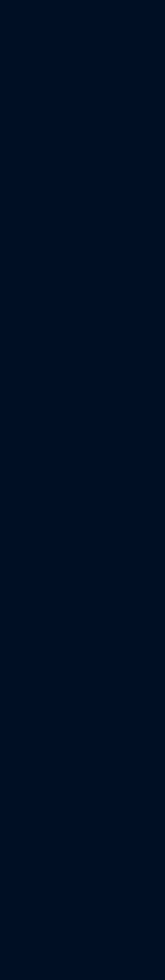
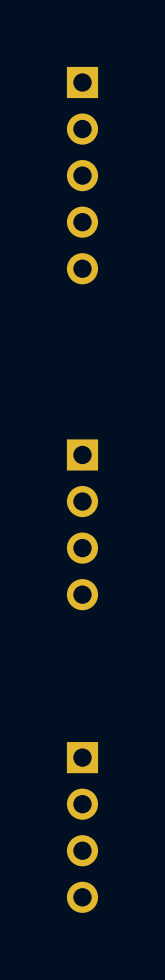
part: none -> (82, 175)
part: none -> (82, 524)
part: none -> (82, 827)

